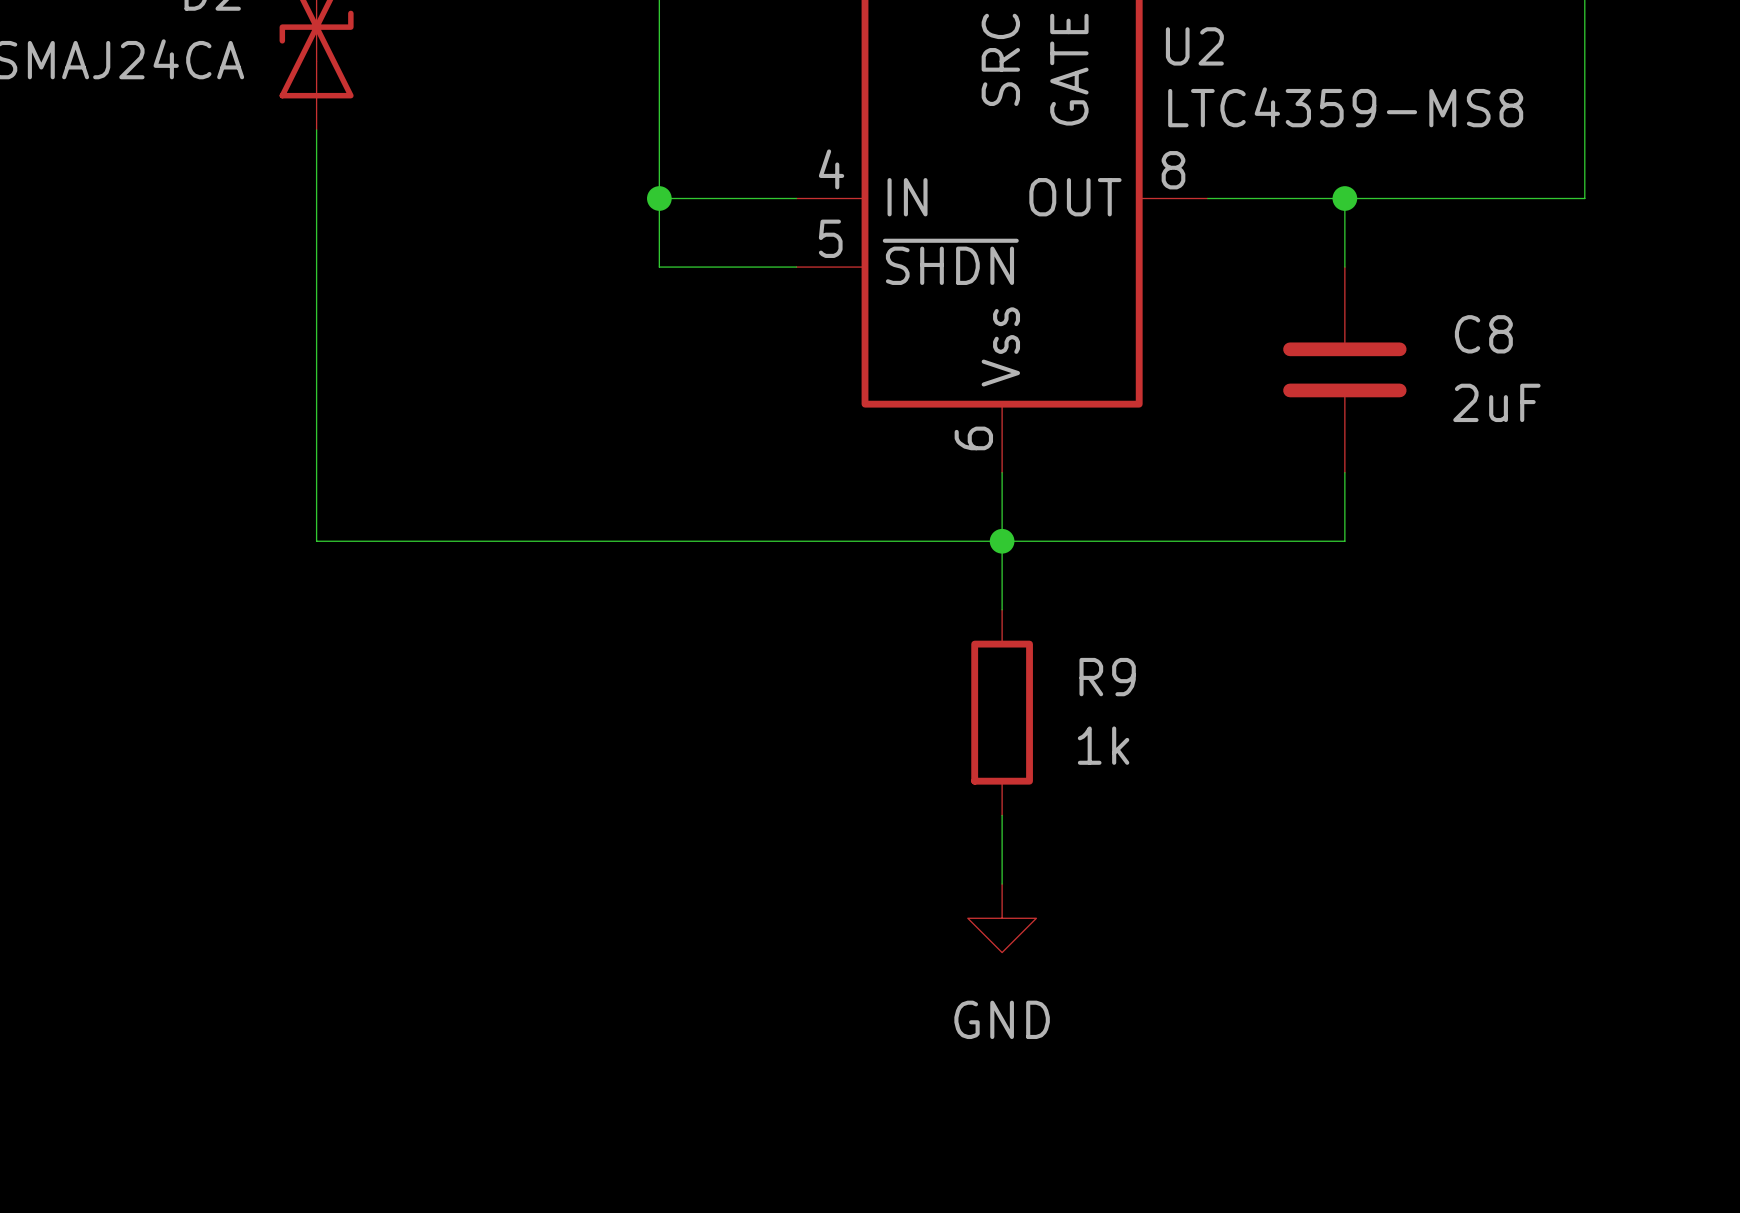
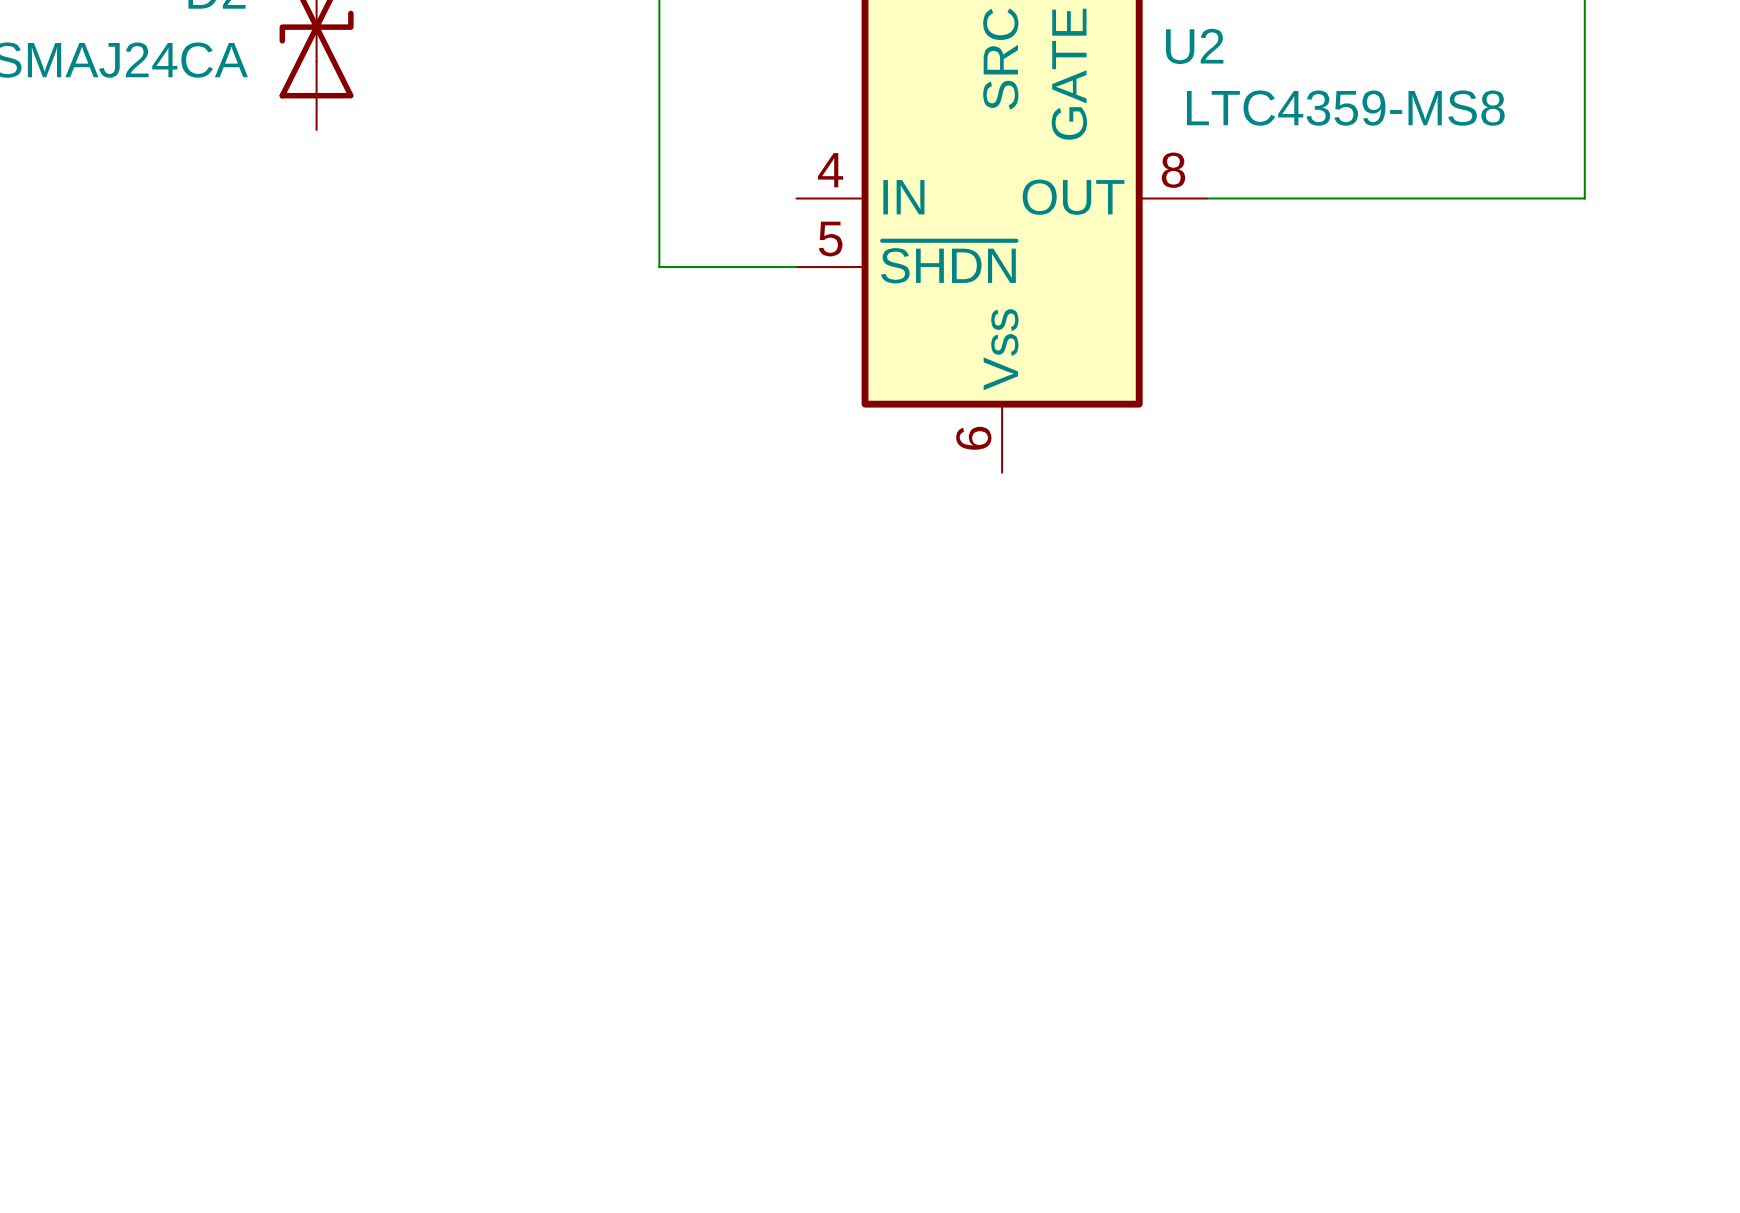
wire: (316, 129) (316, 541) (1344, 541) (1344, 472) -> none
wire: (659, 198) (796, 198) -> none
junction: (659, 198) -> none
wire: (1344, 198) (1344, 267) -> none
junction: (1344, 198) -> none
C8: 2uF (1344, 369) -> none
wire: (1002, 472) (1002, 609) -> none
junction: (1002, 541) -> none
R9: 1k (1002, 712) -> none
wire: (1002, 815) (1002, 884) -> none
power symbol: GND (1002, 918) -> none

